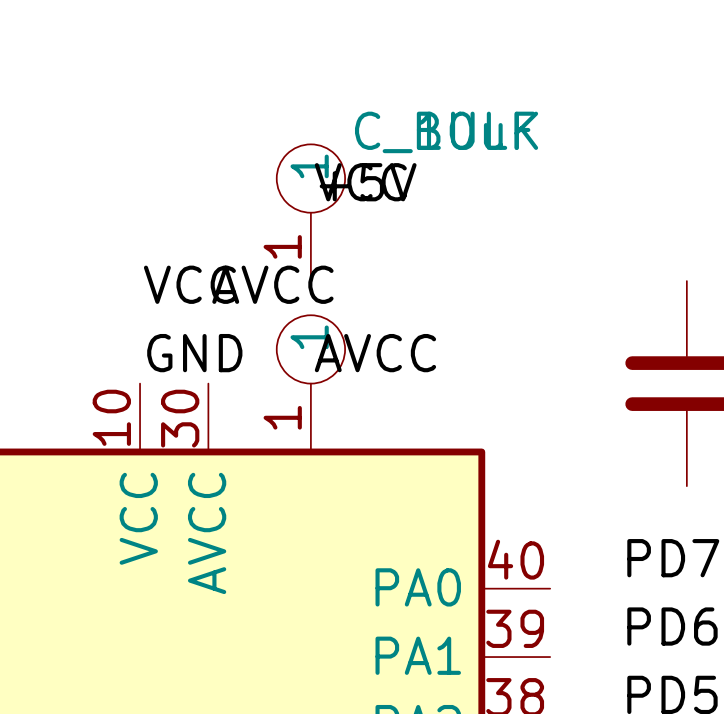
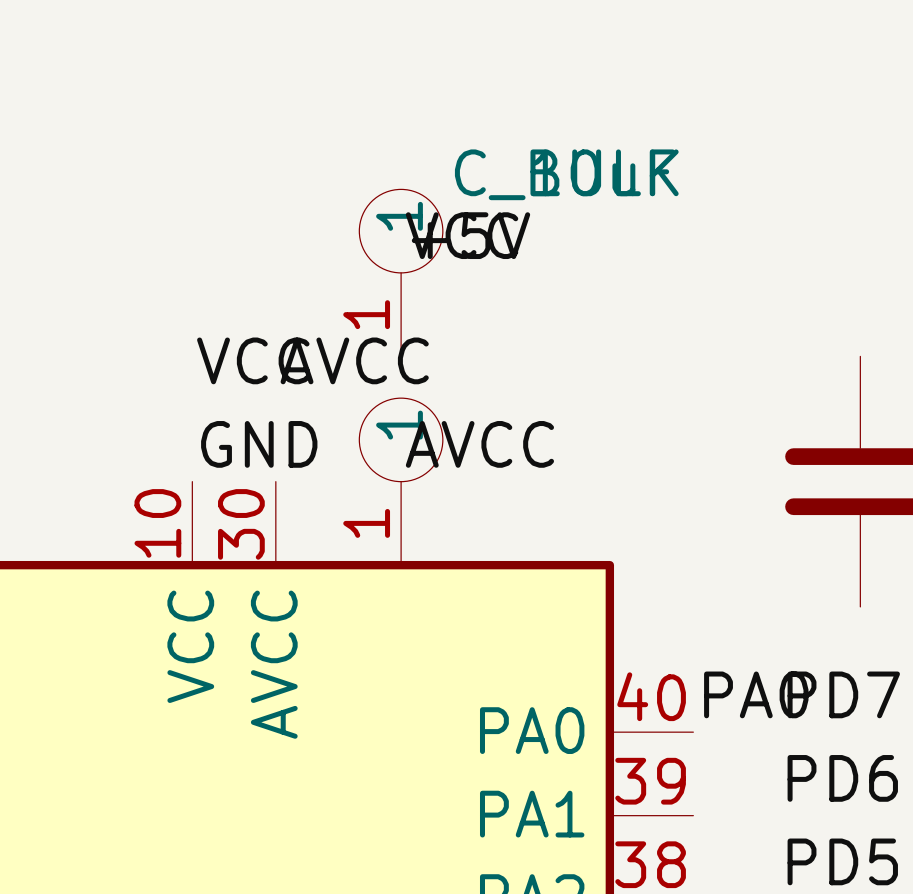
label: none -> PA0 (756, 694)

